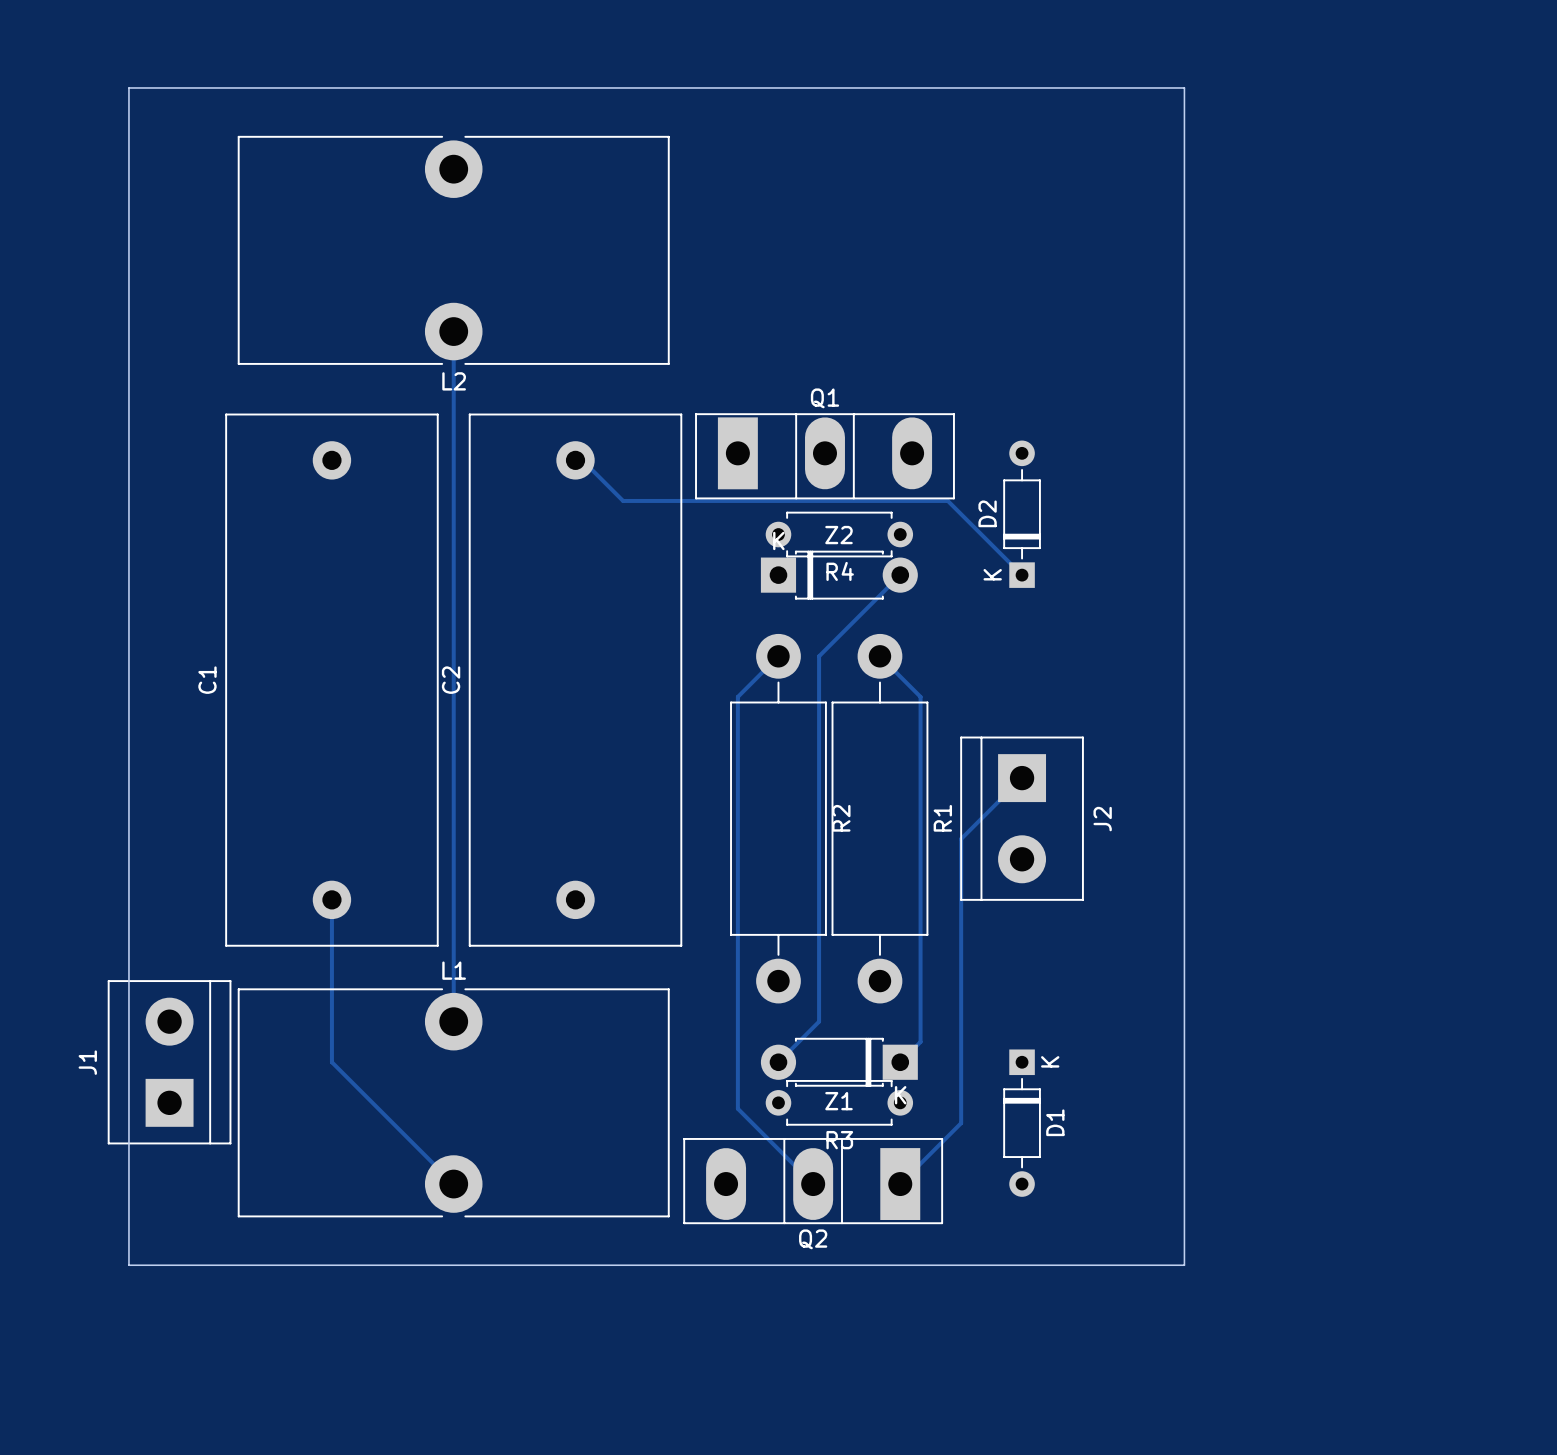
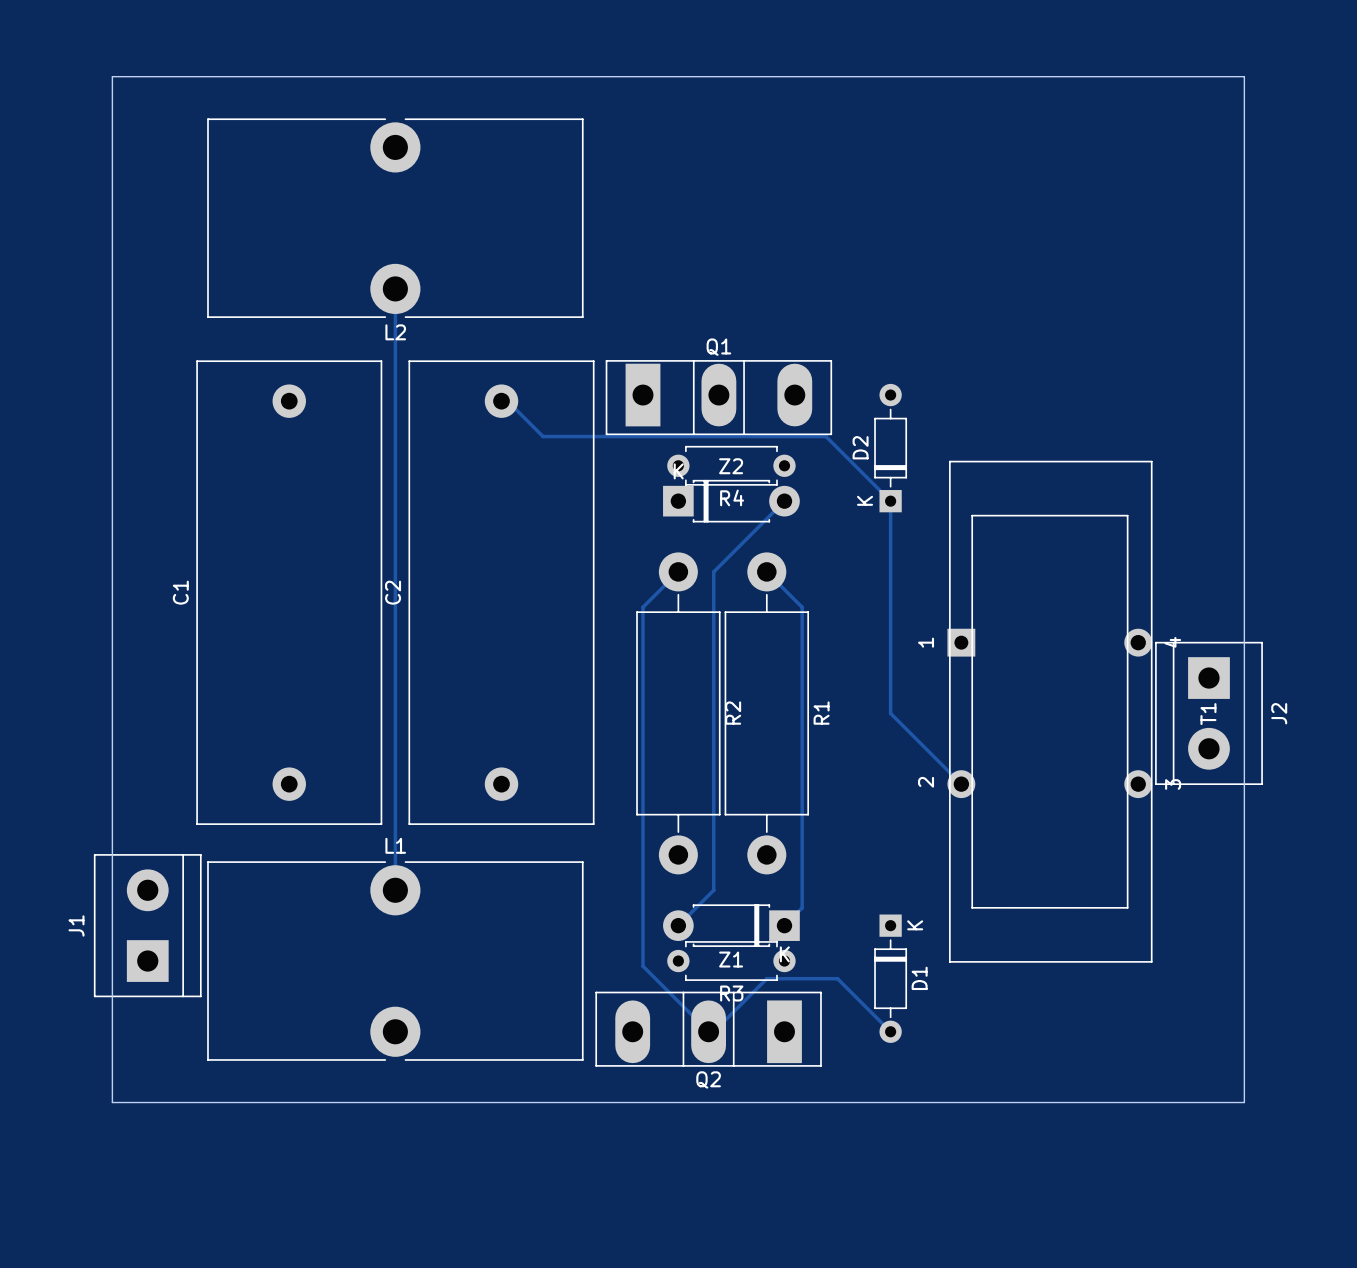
board edge: (1184, 87) (1184, 1265) -> (1032, 76) (1244, 76) (1244, 1102) (1032, 1102)
track: none -> (890, 501) (890, 713) (961, 784)
track: (1022, 778) (961, 838) (961, 1123) (900, 1184) -> none
T1: none -> (1049, 711)
J2 position: (1022, 818) -> (1208, 713)
track: (331, 899) (331, 1062) (453, 1184) -> none
track: none -> (713, 1031) (766, 978) (837, 978) (890, 1031)

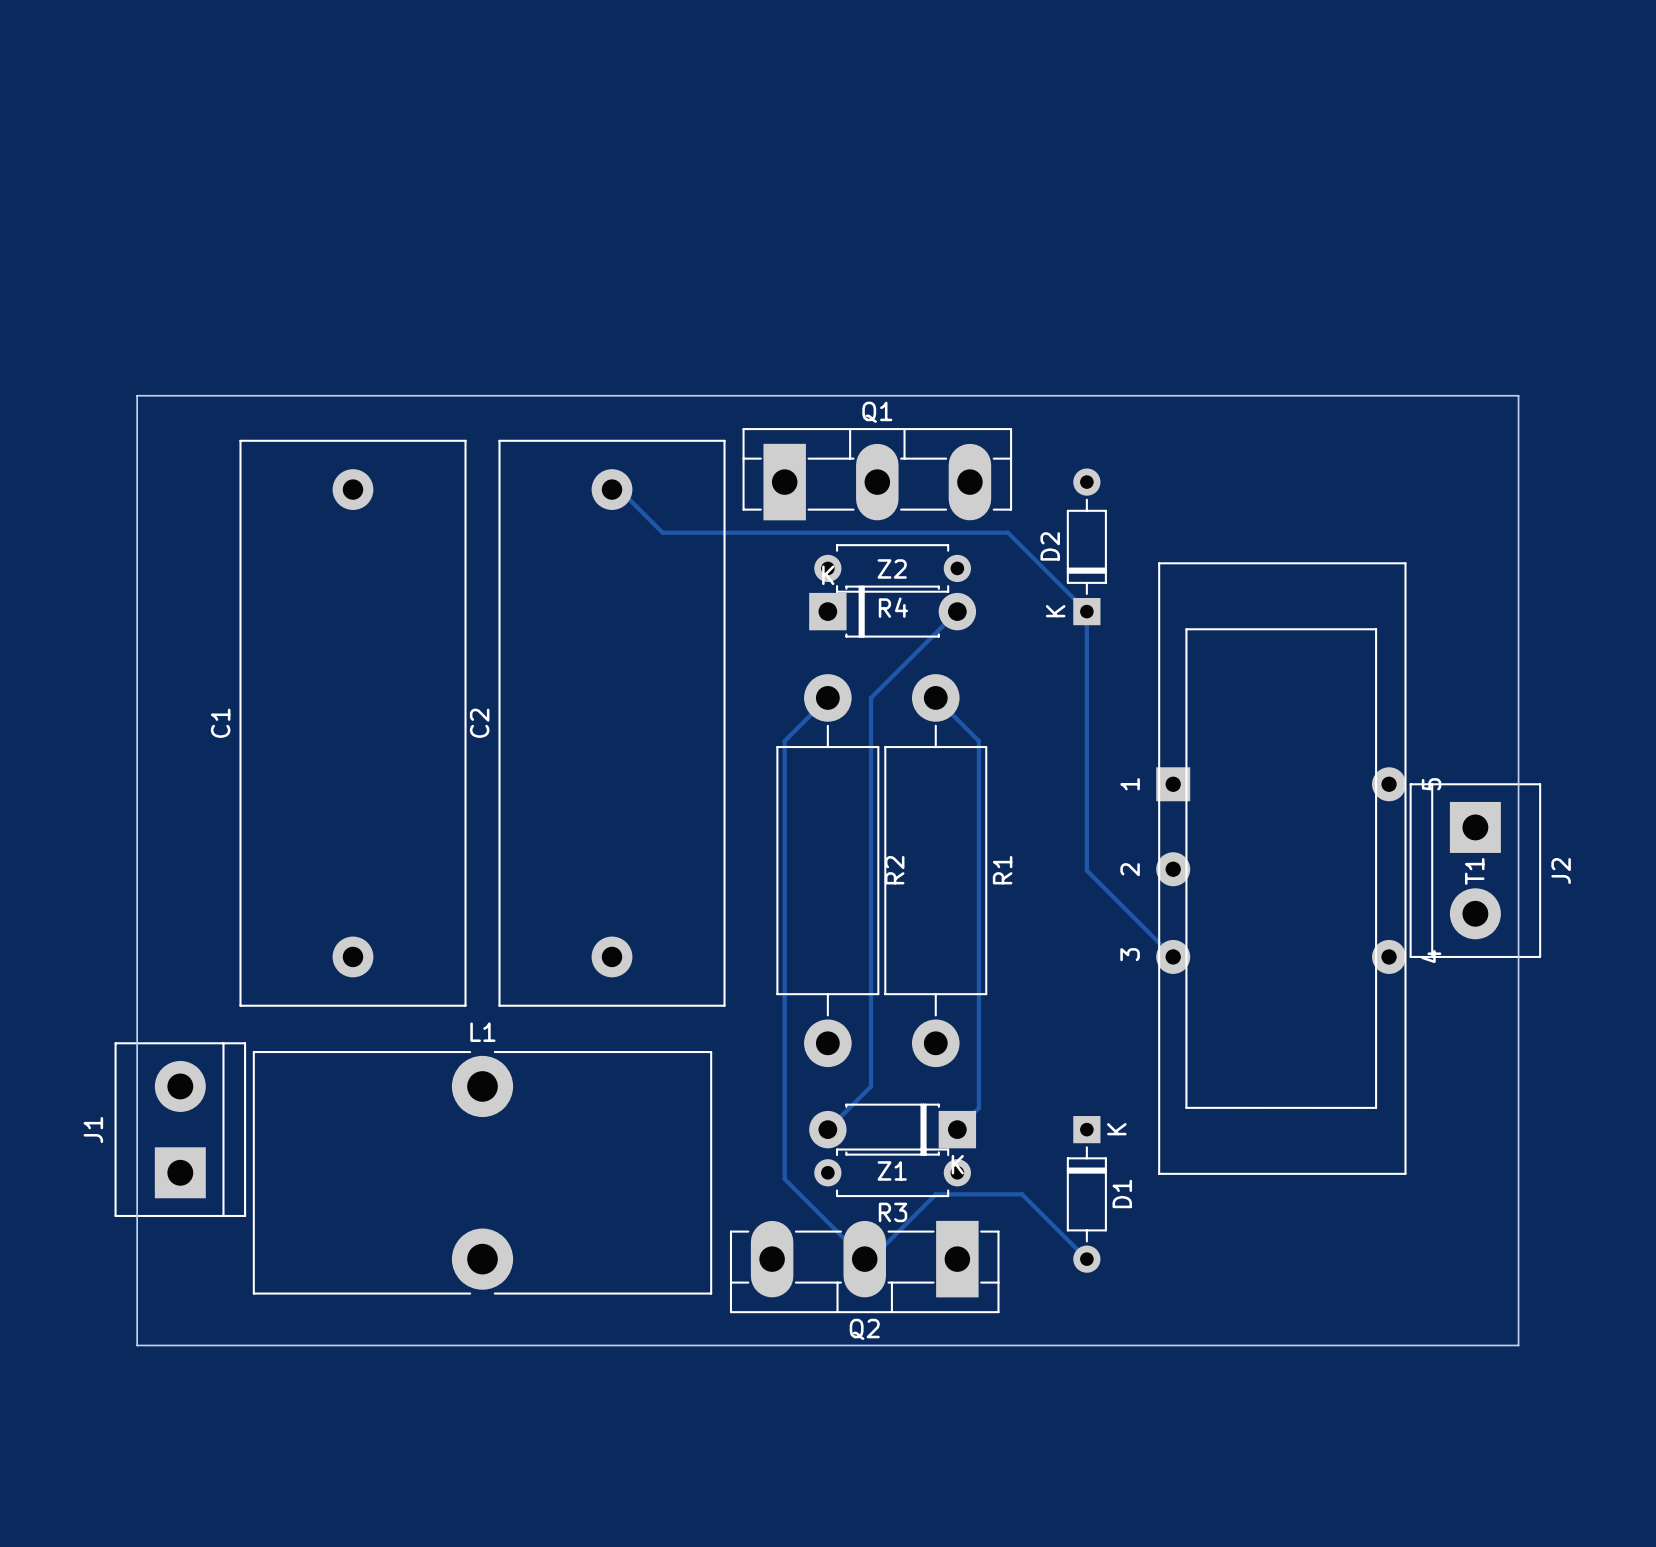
L2: (395, 218) -> none
track: (395, 288) (395, 890) -> none
board edge: (112, 324) (112, 76) (1244, 76) (1244, 324) -> (137, 395) (1518, 395)
Q1 footprint: [605, 360, 833, 436] -> [742, 428, 1013, 521]
T1 footprint: [947, 460, 1153, 963] -> [1156, 562, 1407, 1175]
Q2 footprint: [595, 991, 822, 1067] -> [729, 1220, 1000, 1314]

